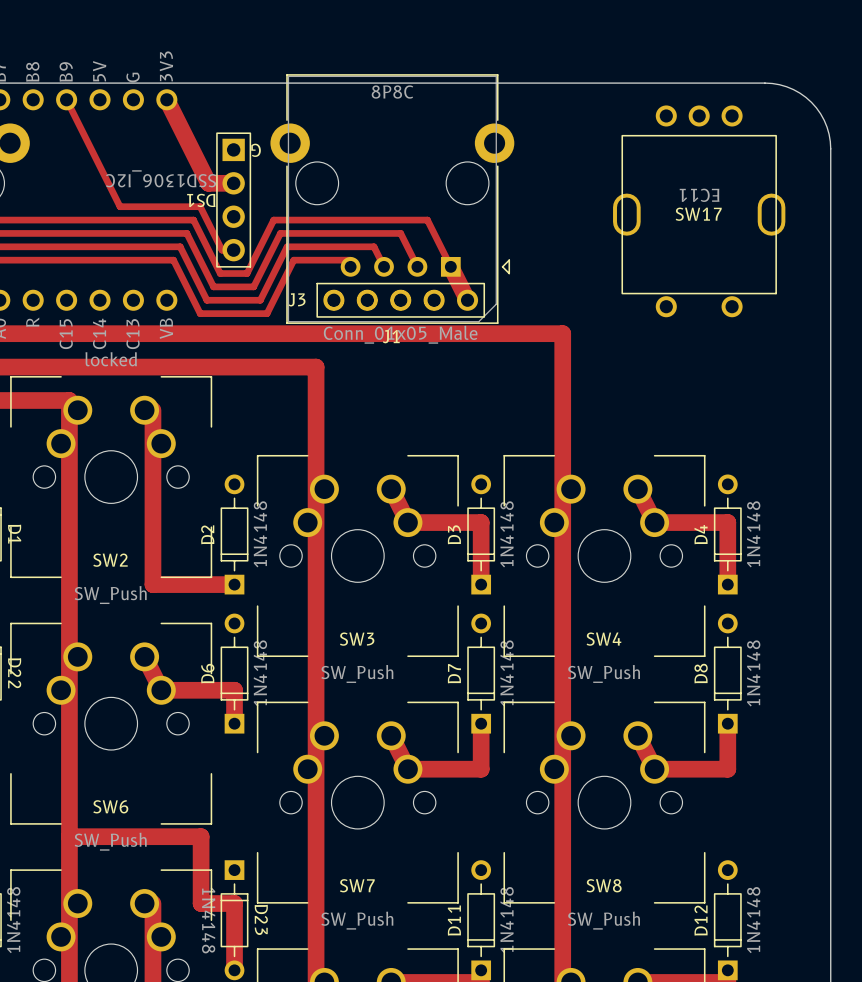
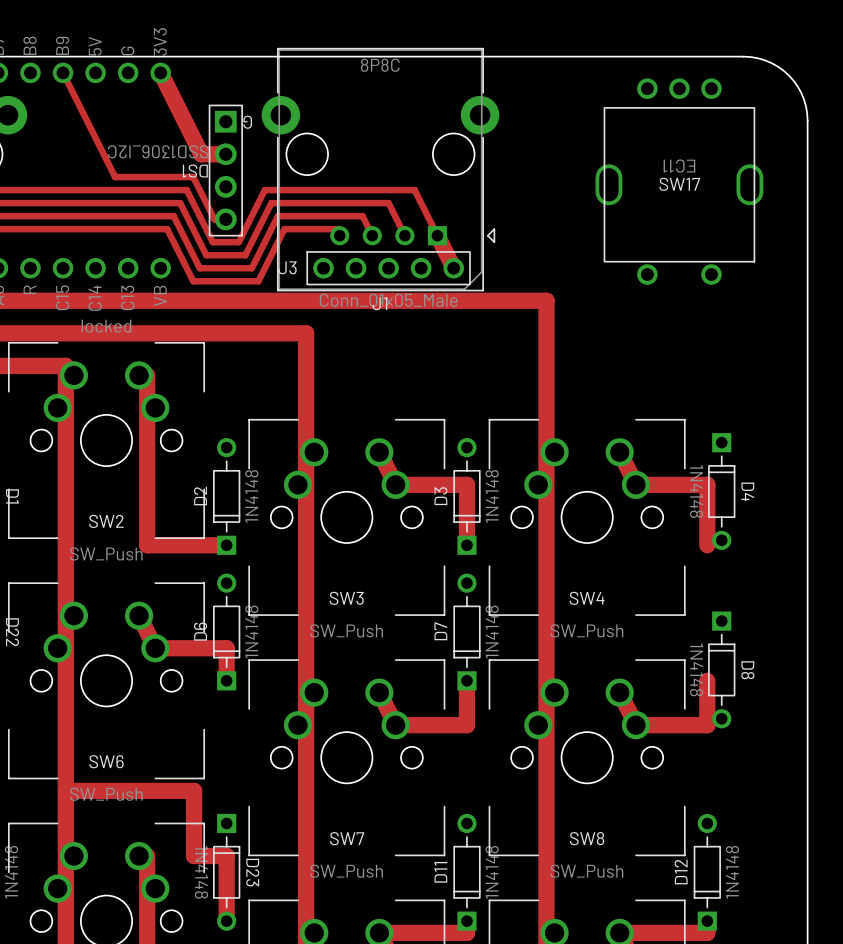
D4 rotation: 0° (727, 534) -> 180° (721, 491)
D8 rotation: 0° (727, 673) -> 180° (721, 669)

